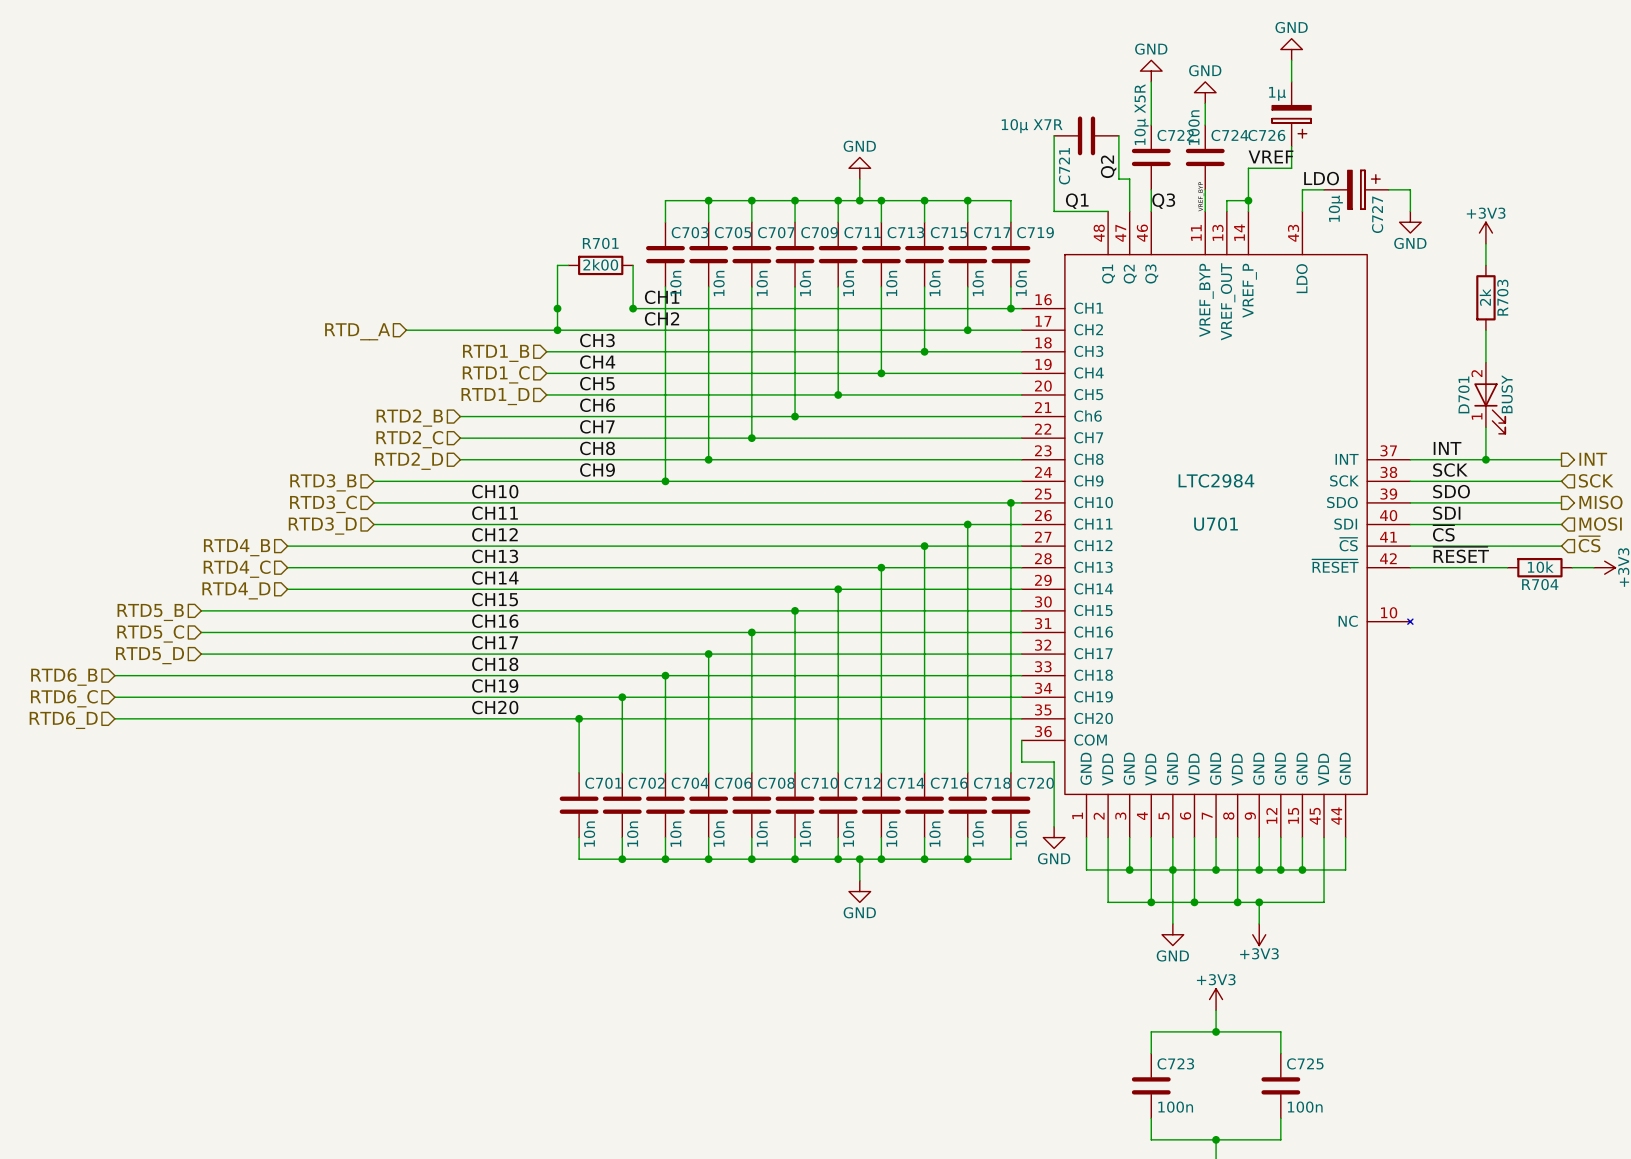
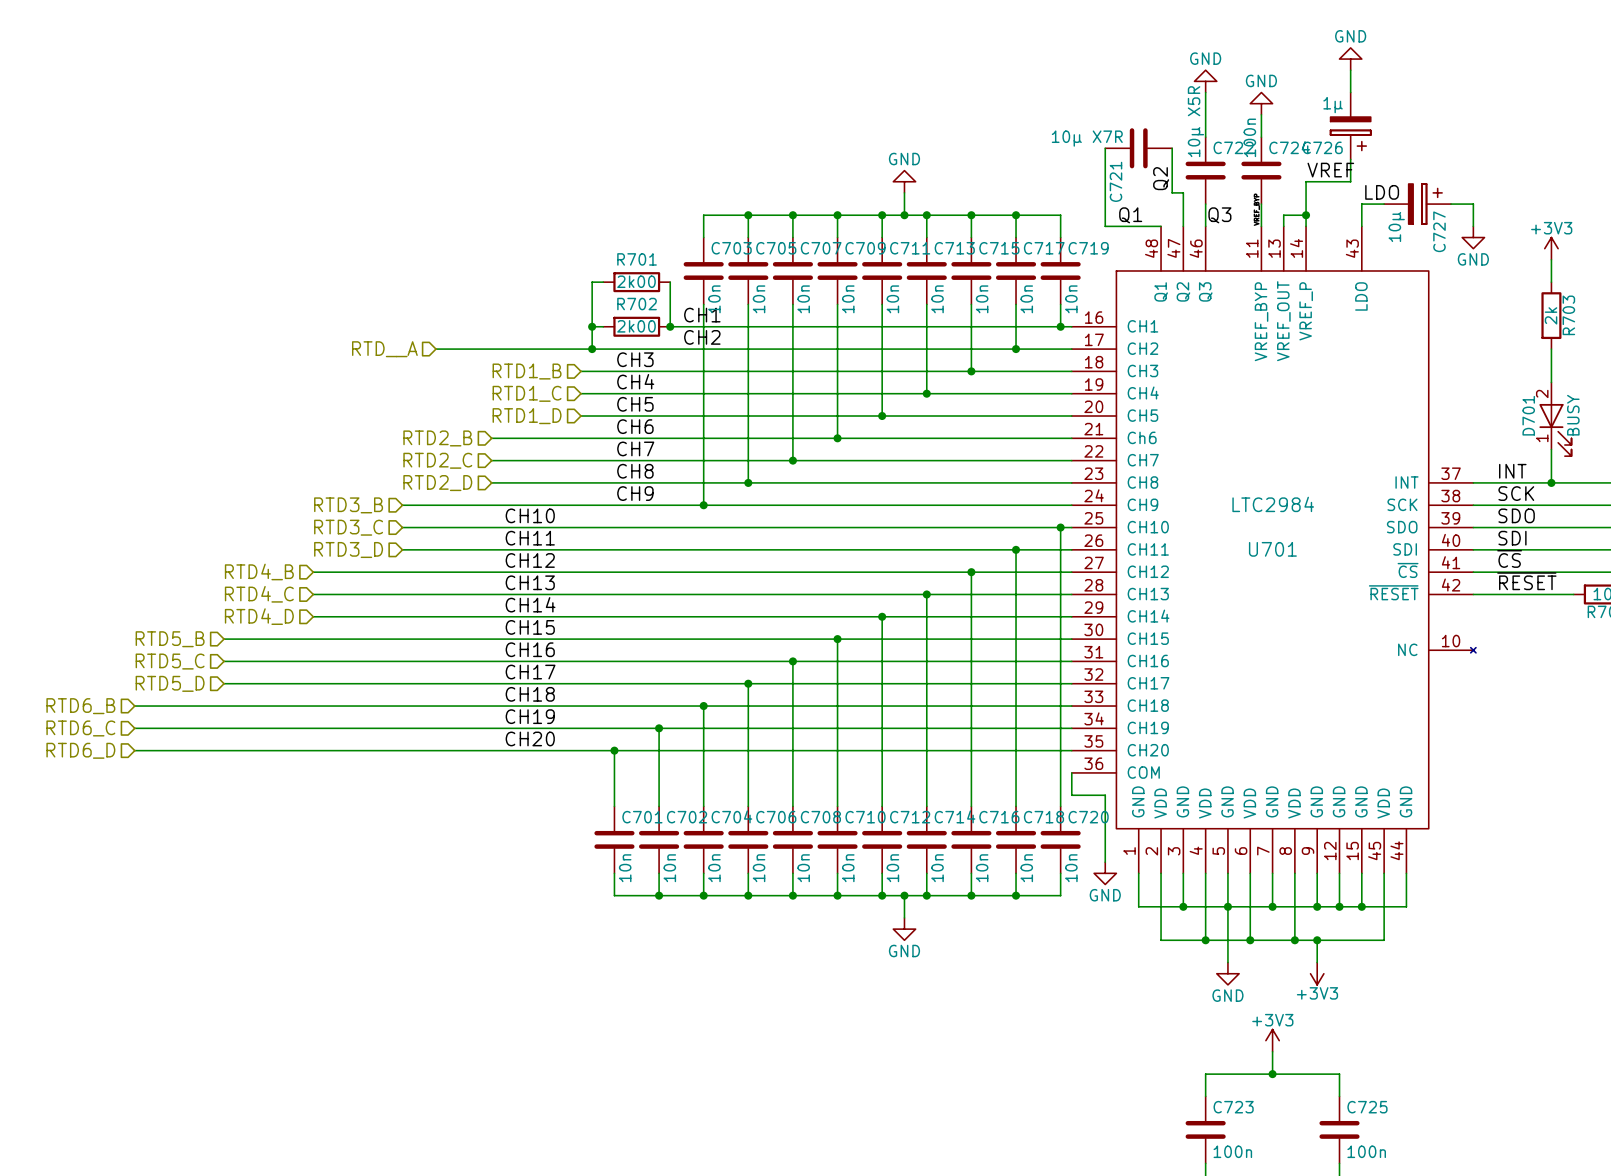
wire: none -> (592, 326) (603, 326)
R702: none -> 2k00 (636, 326)

